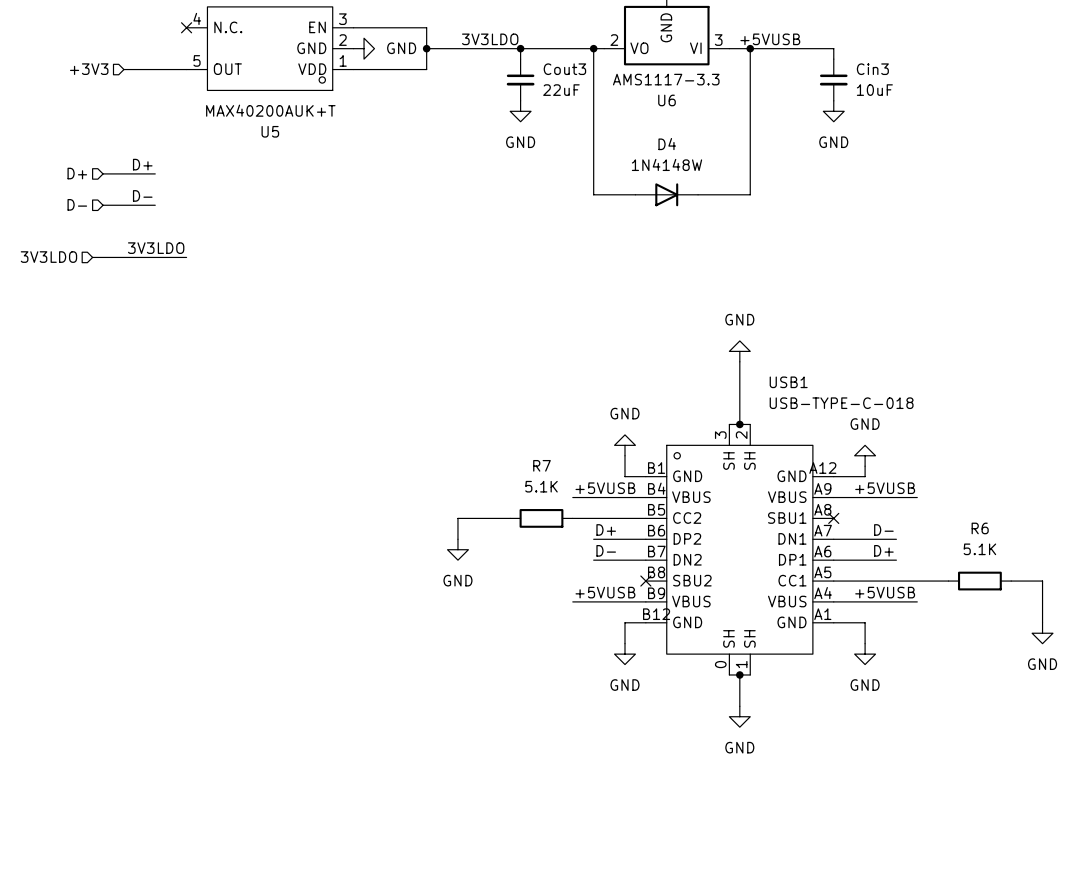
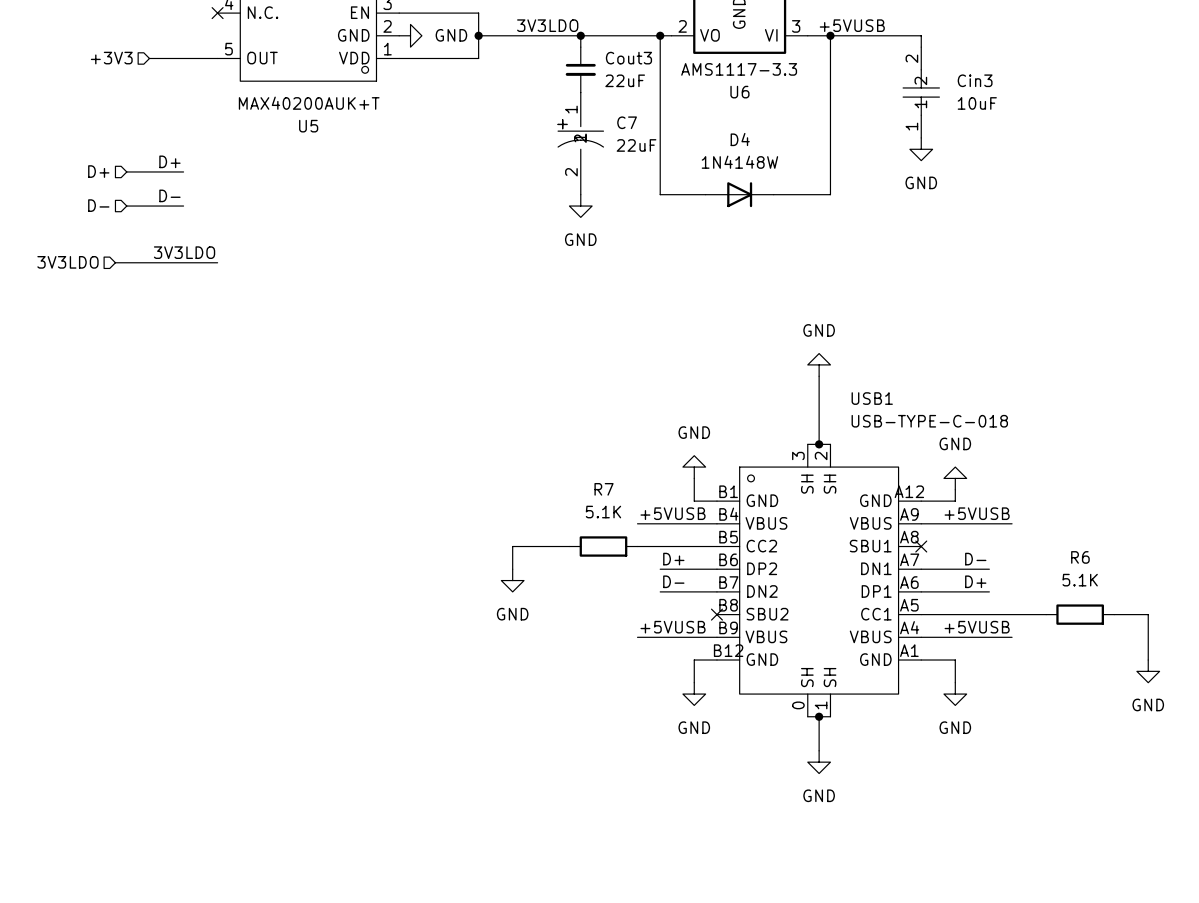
Cin3 symbol: [819, 59, 848, 101] -> [903, 47, 940, 138]
power symbol position: GND (520, 111) -> GND (580, 206)
power symbol position: GND (833, 111) -> GND (921, 149)
C7: none -> 22uF (580, 143)

